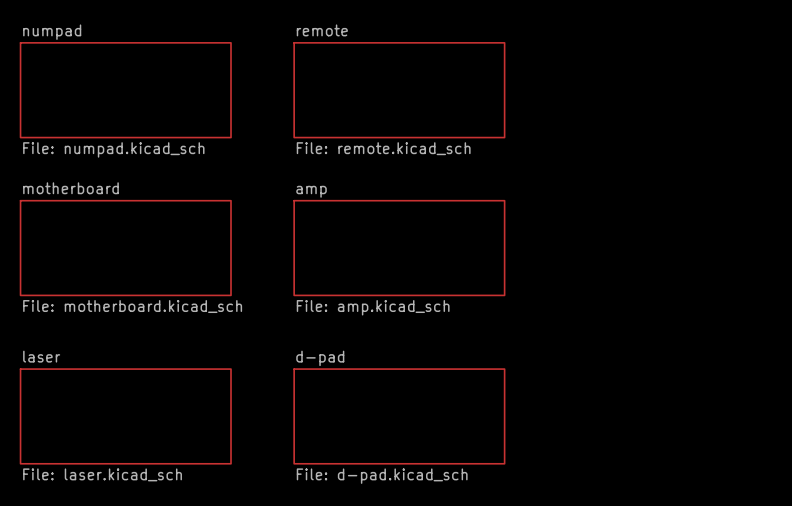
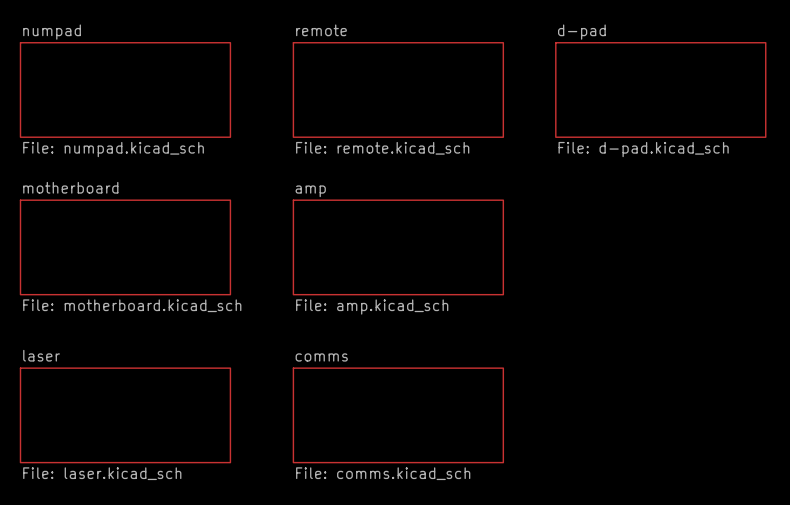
sheet d-pad: none -> File: d-pad.kicad_sch (660, 89)
sheet d-pad name: d-pad (320, 358) -> comms (321, 357)
sheet d-pad value: File: d-pad.kicad_sch (382, 476) -> File: comms.kicad_sch (383, 473)

